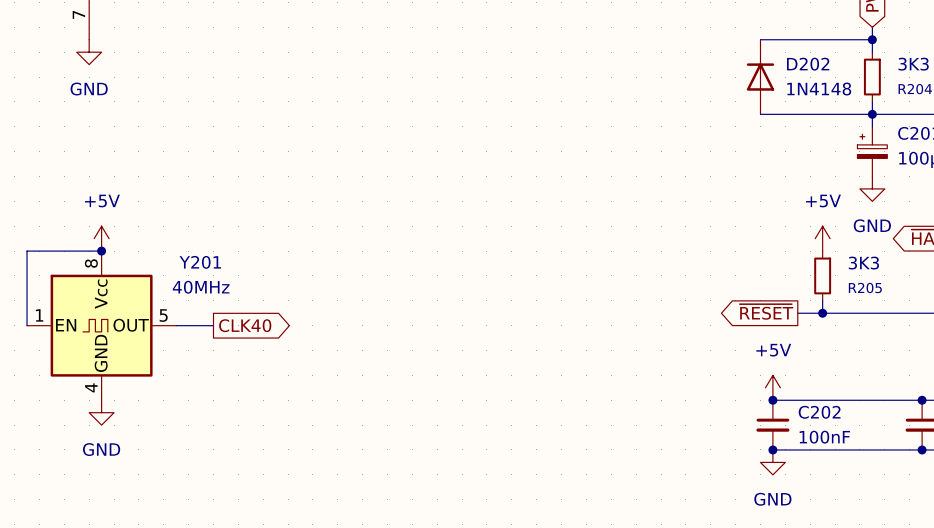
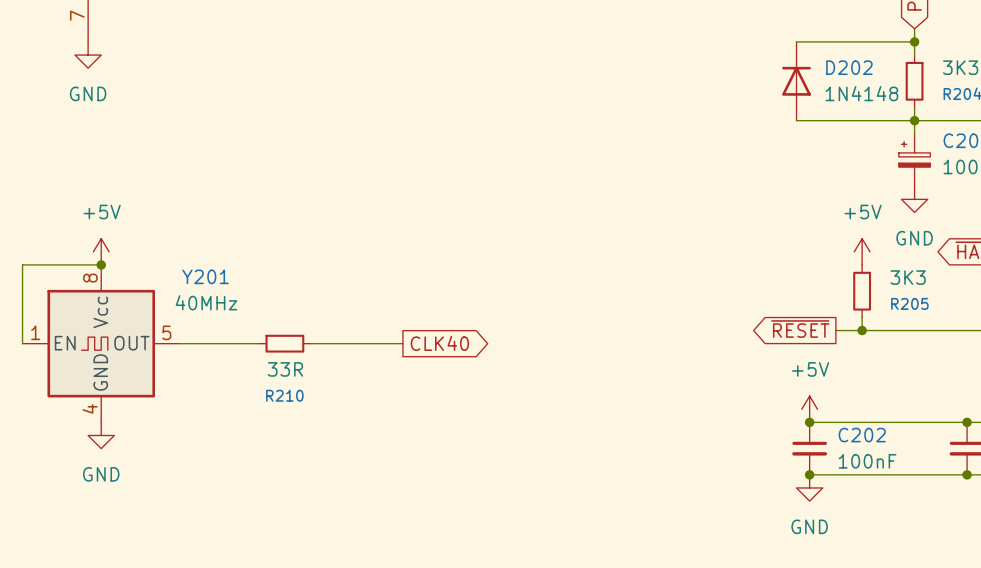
wire: none -> (219, 343) (258, 343)
global label position: CLK40 (245, 325) -> CLK40 (439, 343)
R210: none -> 33R (284, 343)
wire: none -> (311, 343) (402, 343)

